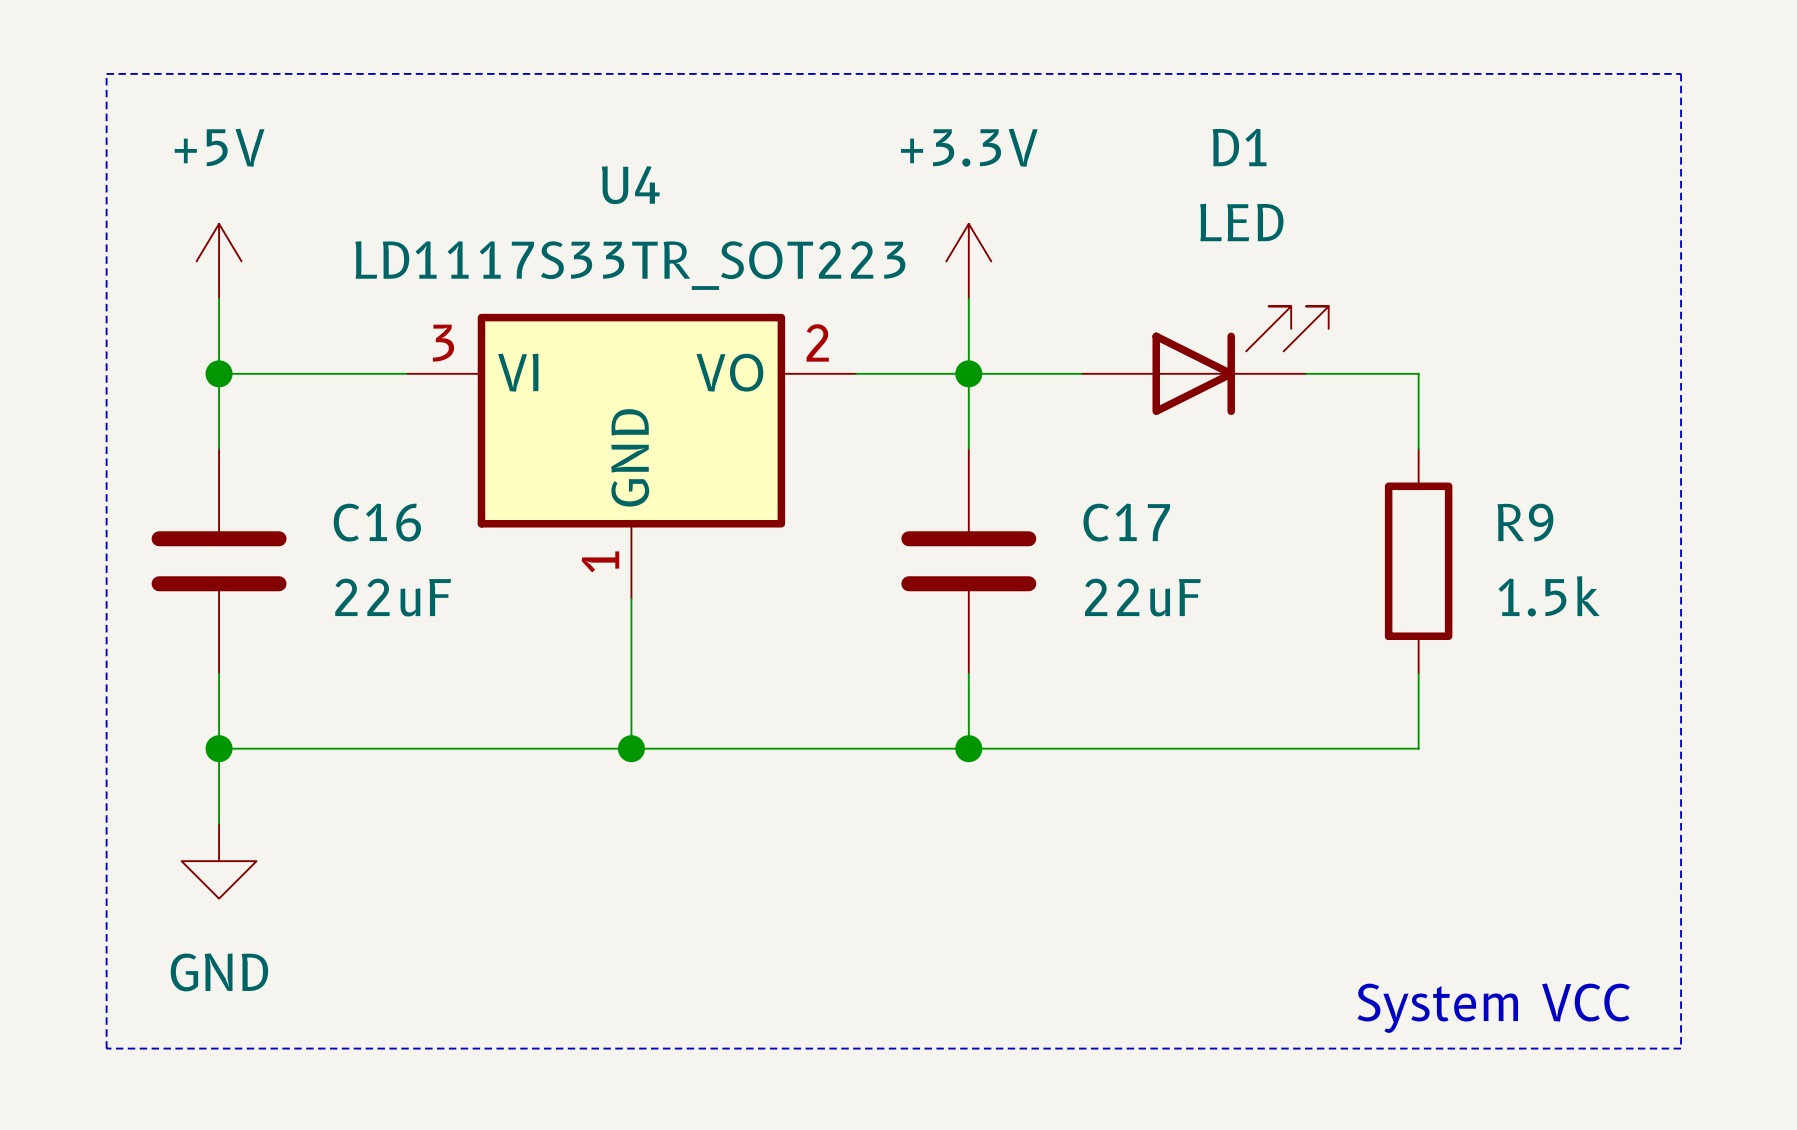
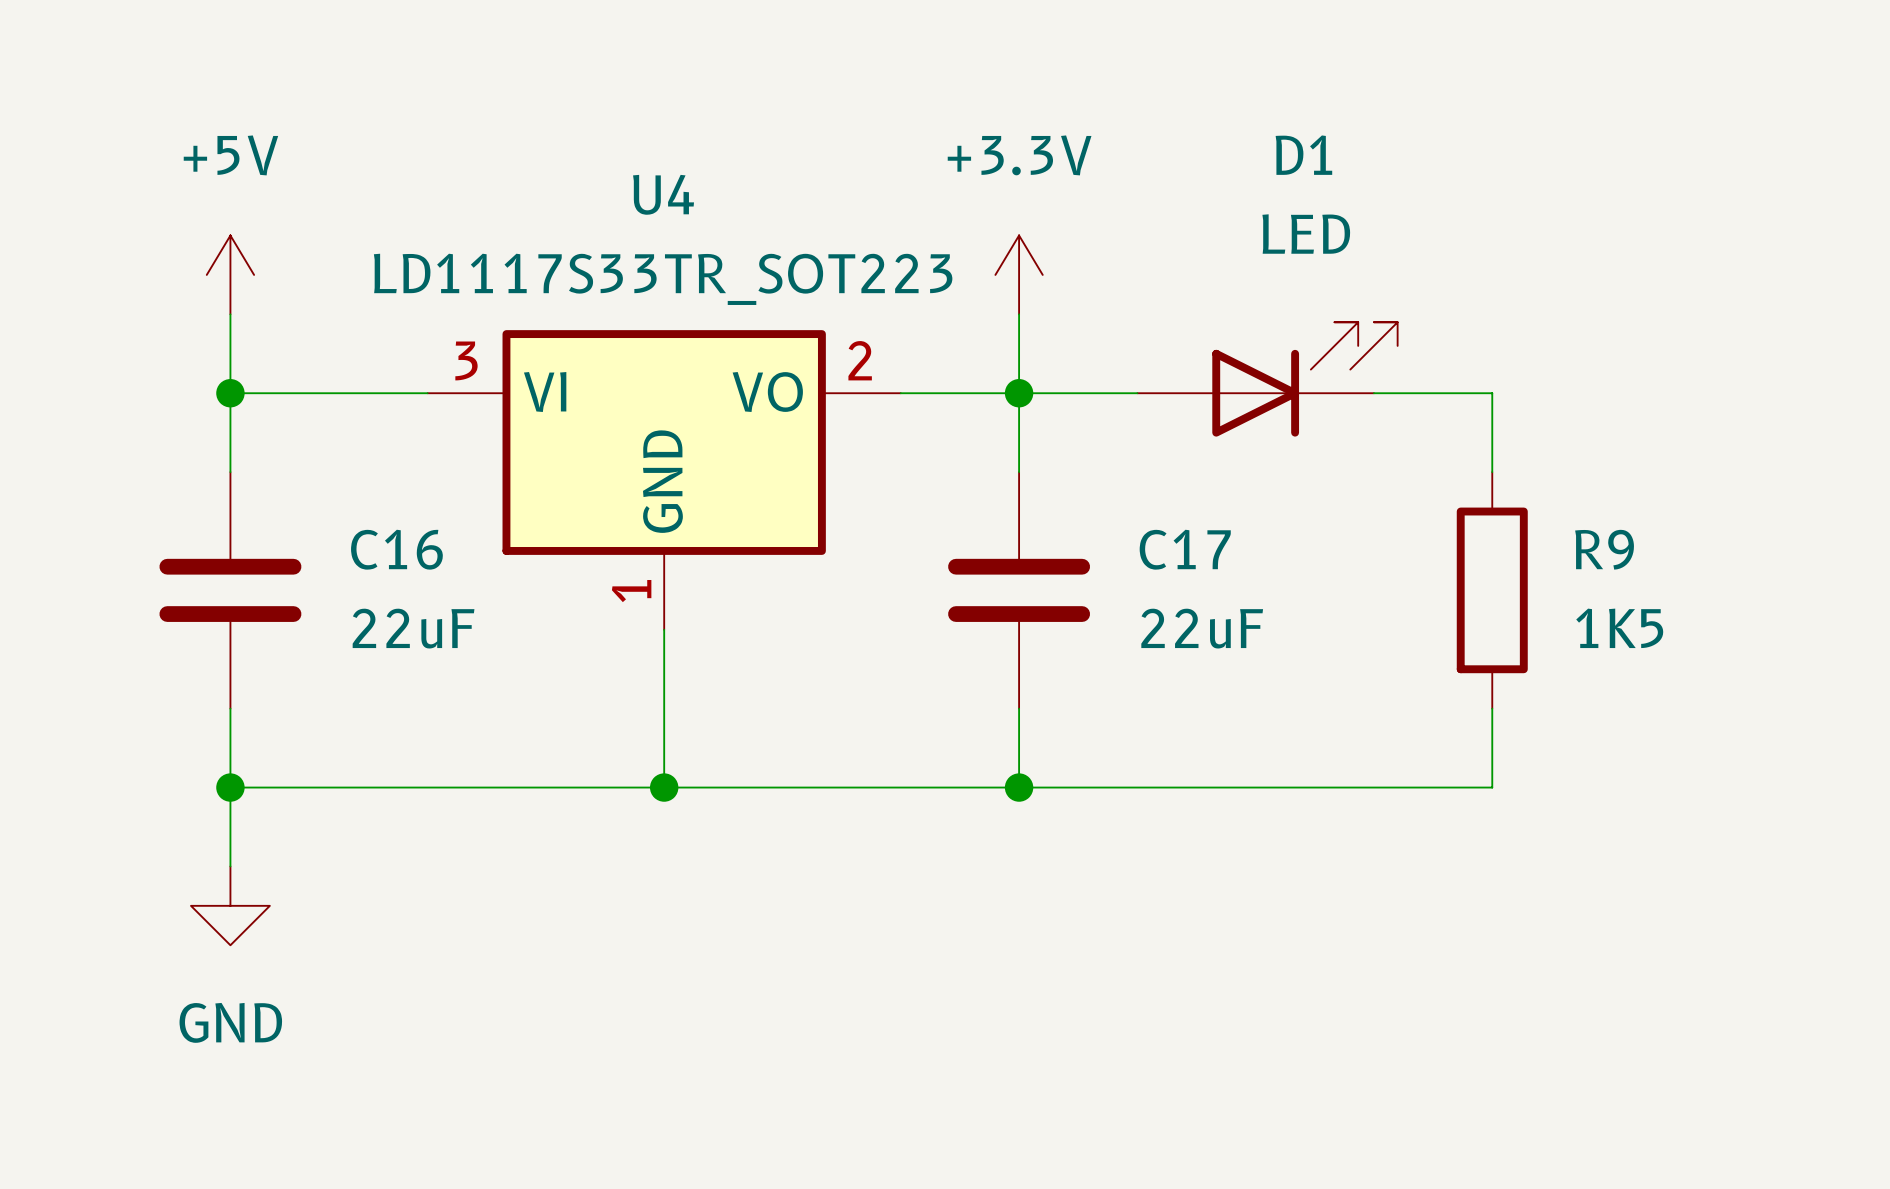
line: (106, 73) (1681, 73) (1681, 1048) (106, 1048) (106, 73) -> none
R9 value: 1.5k (1549, 596) -> 1K5 (1619, 628)
text: System VCC (1493, 1008) -> none

